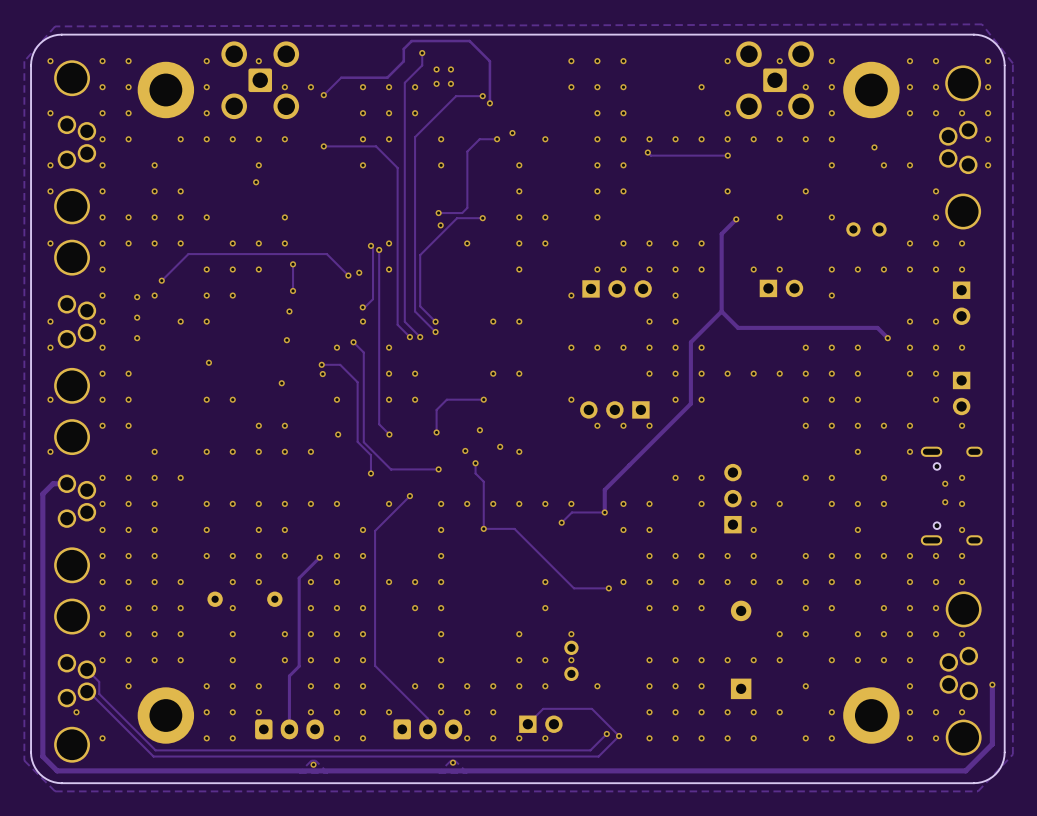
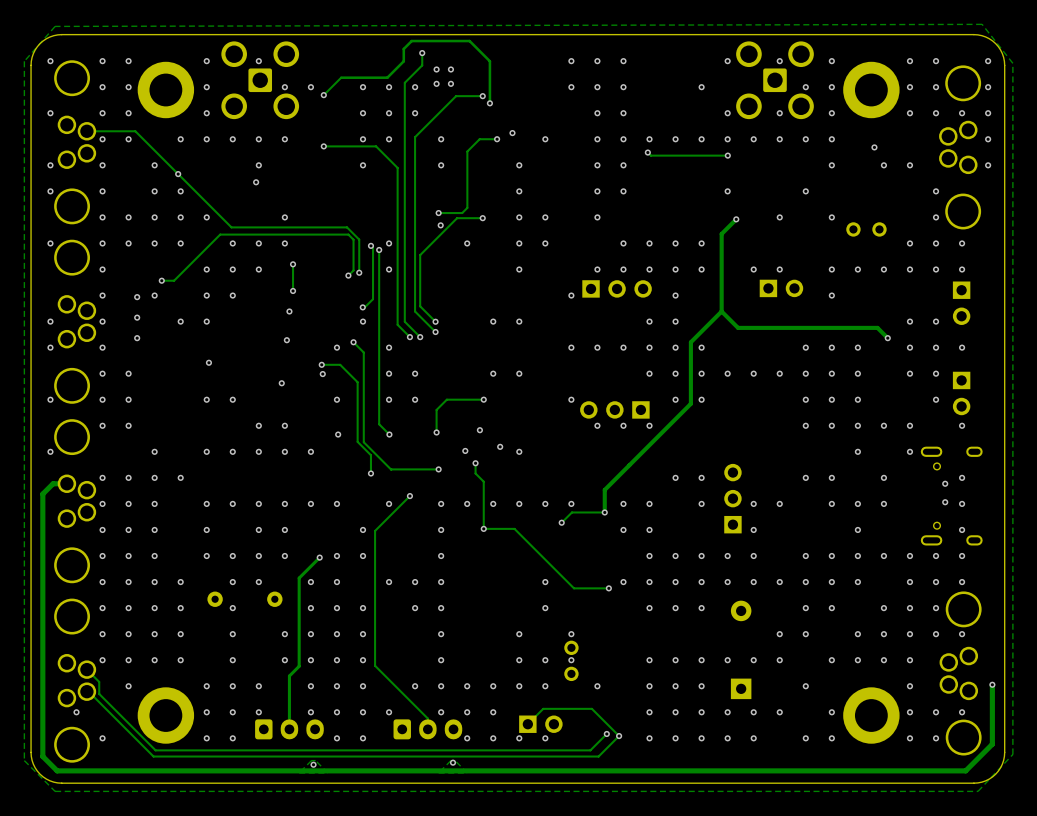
track: none -> (86, 131) (135, 131) (231, 227) (347, 227) (359, 239) (359, 272)
via: none -> (178, 174)
track: (348, 275) (326, 254) (188, 254) (161, 280) -> (348, 275) (353, 270) (353, 239) (348, 234) (220, 234) (174, 280) (161, 280)

